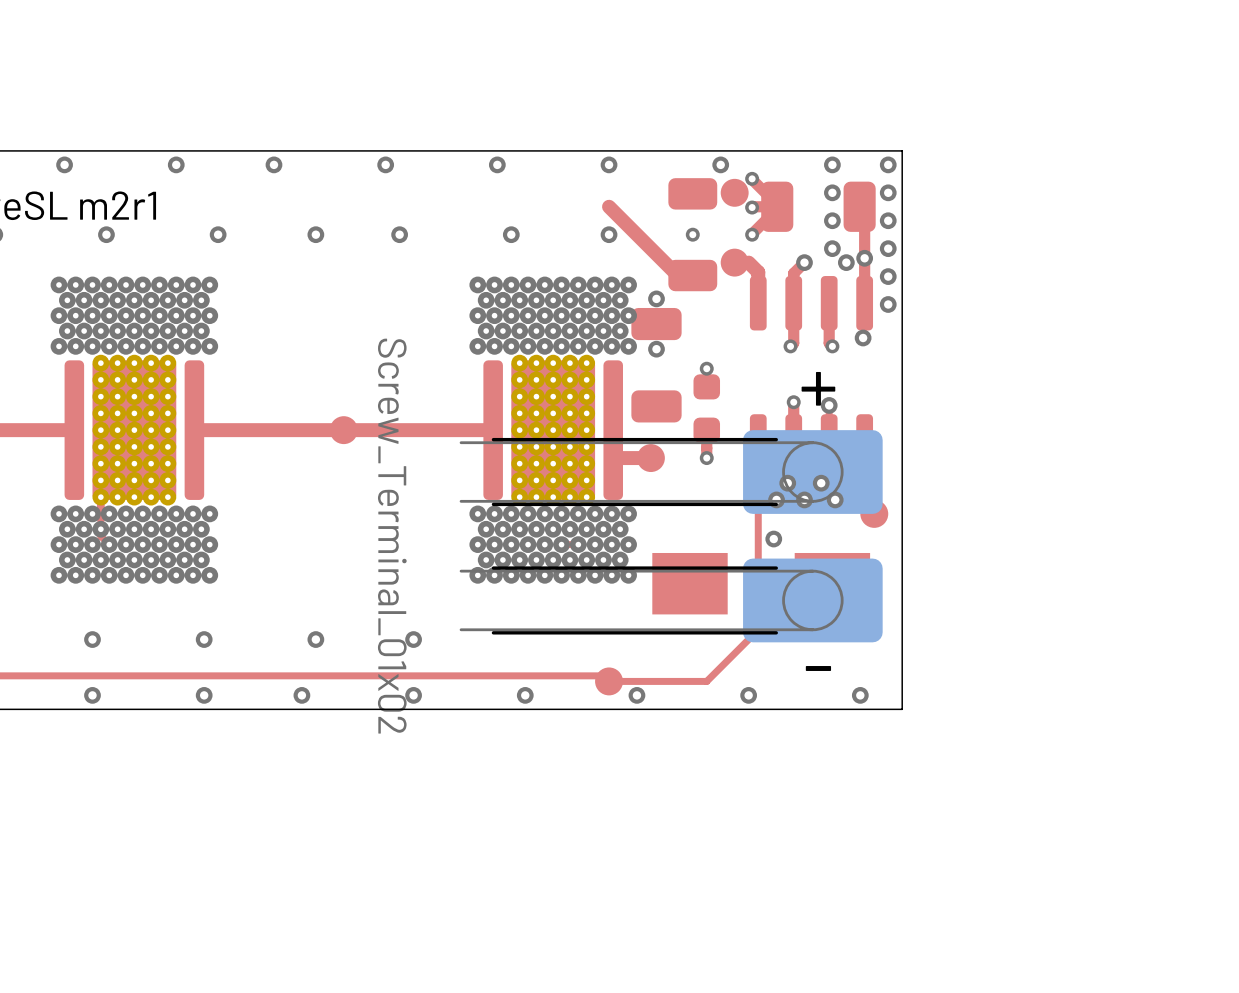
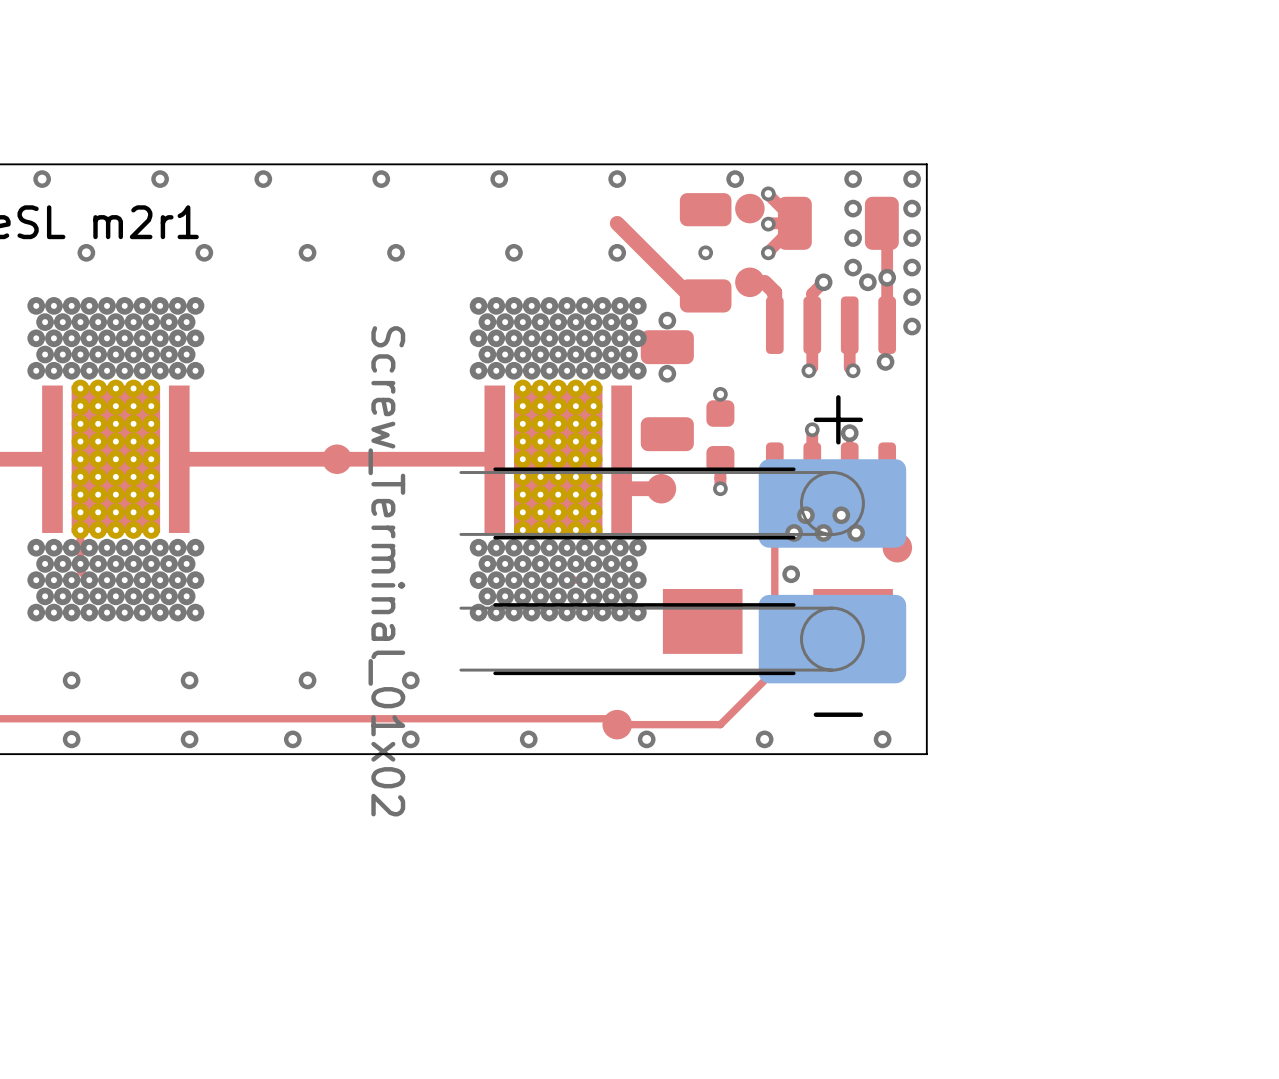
part footprint: [64, 354, 205, 506] -> [42, 379, 190, 539]
part footprint: [483, 354, 623, 506] -> [484, 379, 632, 539]

